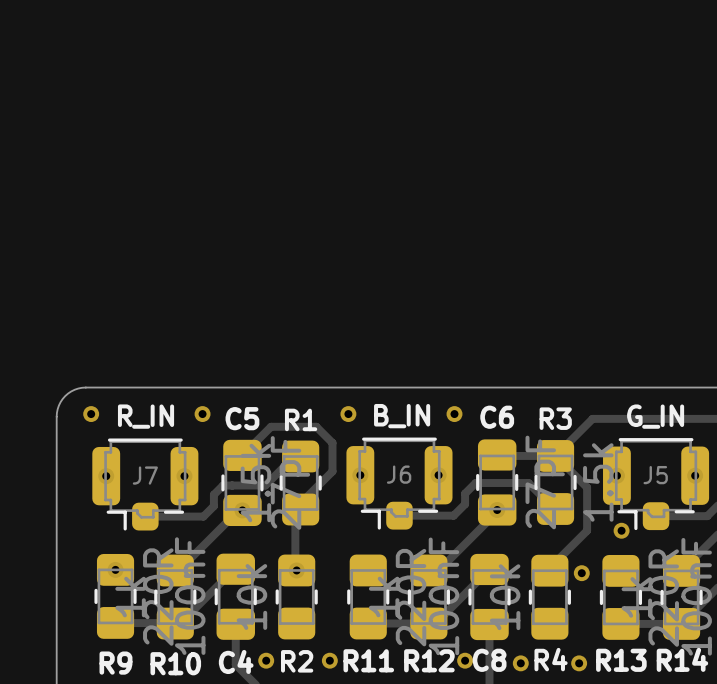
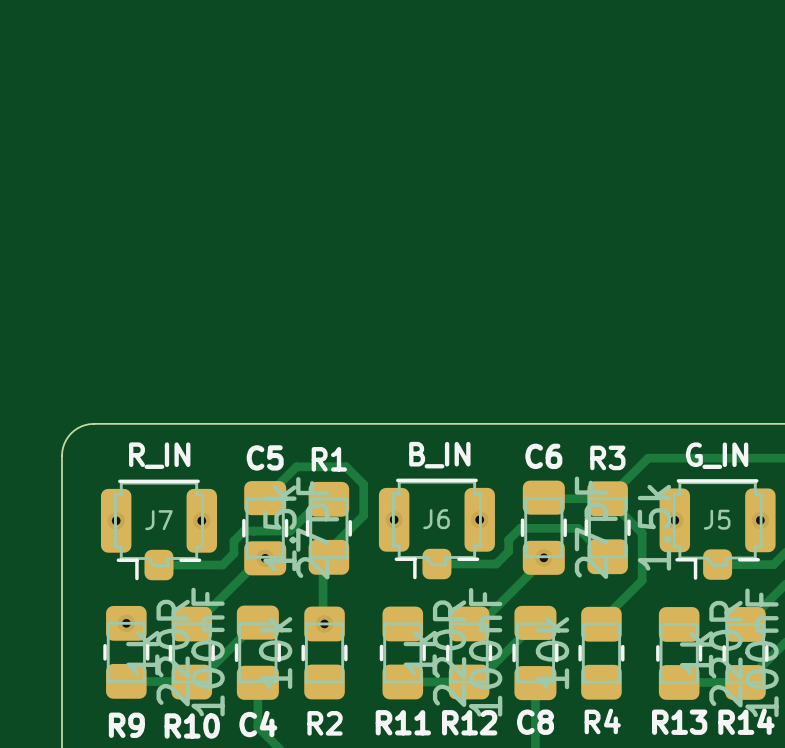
via: (91, 414) -> none
via: (202, 414) -> none
via: (348, 414) -> none
via: (454, 414) -> none
via: (621, 530) -> none
via: (581, 573) -> none
via: (266, 660) -> none
via: (329, 660) -> none
via: (465, 660) -> none
via: (520, 663) -> none
via: (579, 663) -> none

